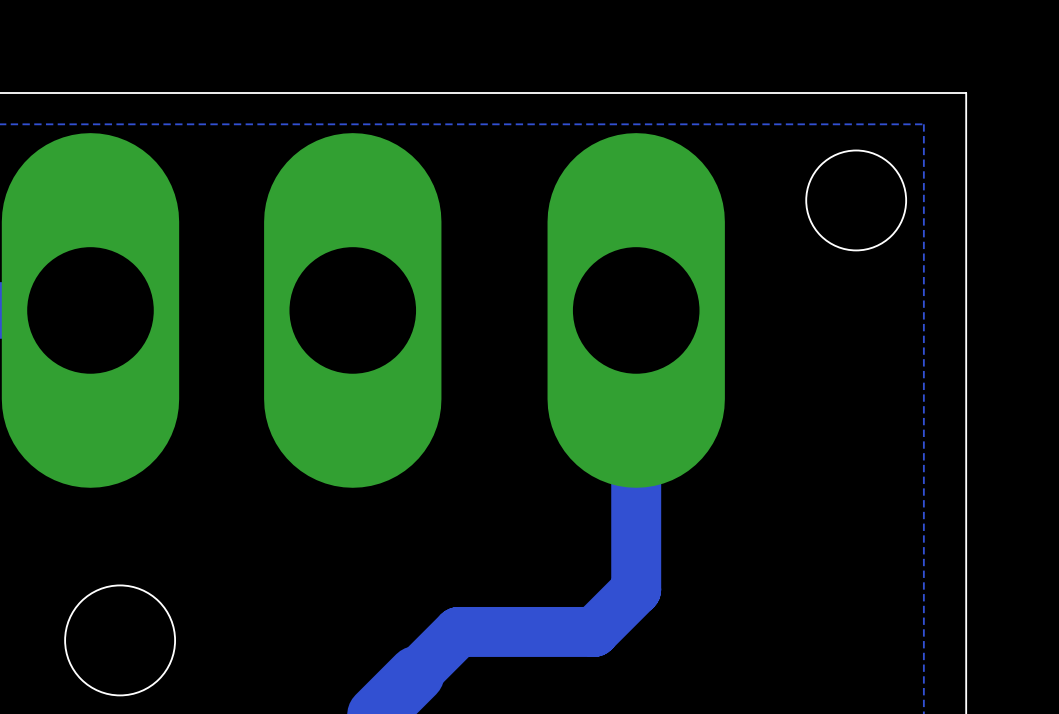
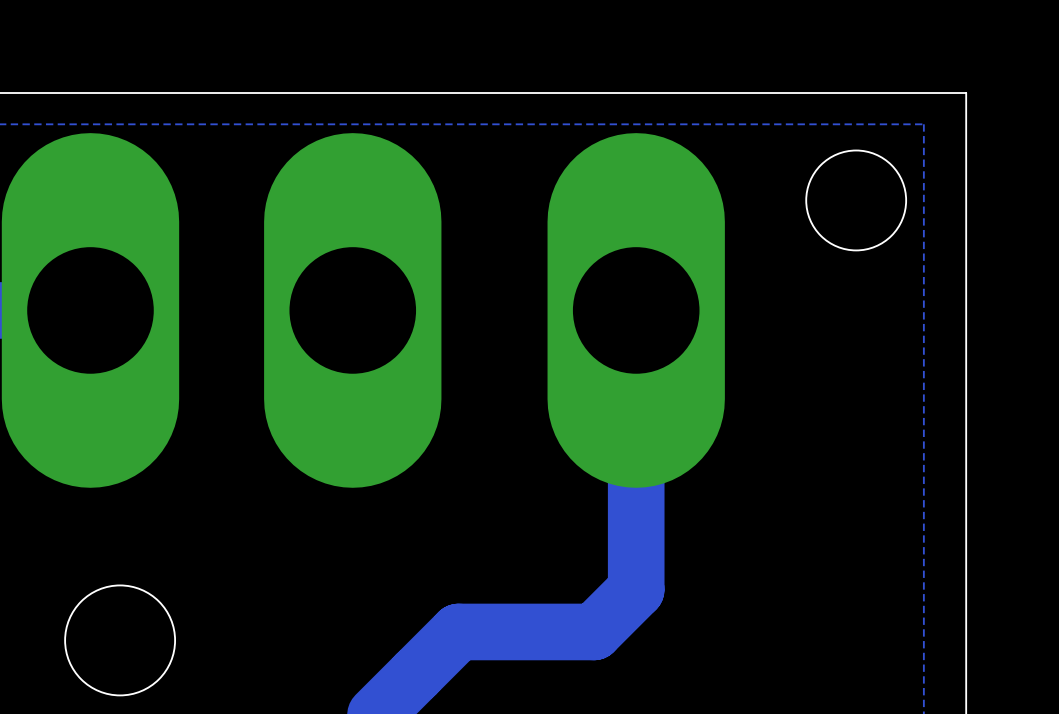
bottom track width: thin (636, 310) (636, 589) (593, 631) (458, 631) (416, 674) -> thick (636, 310) (636, 589) (593, 631) (458, 631) (416, 674)

